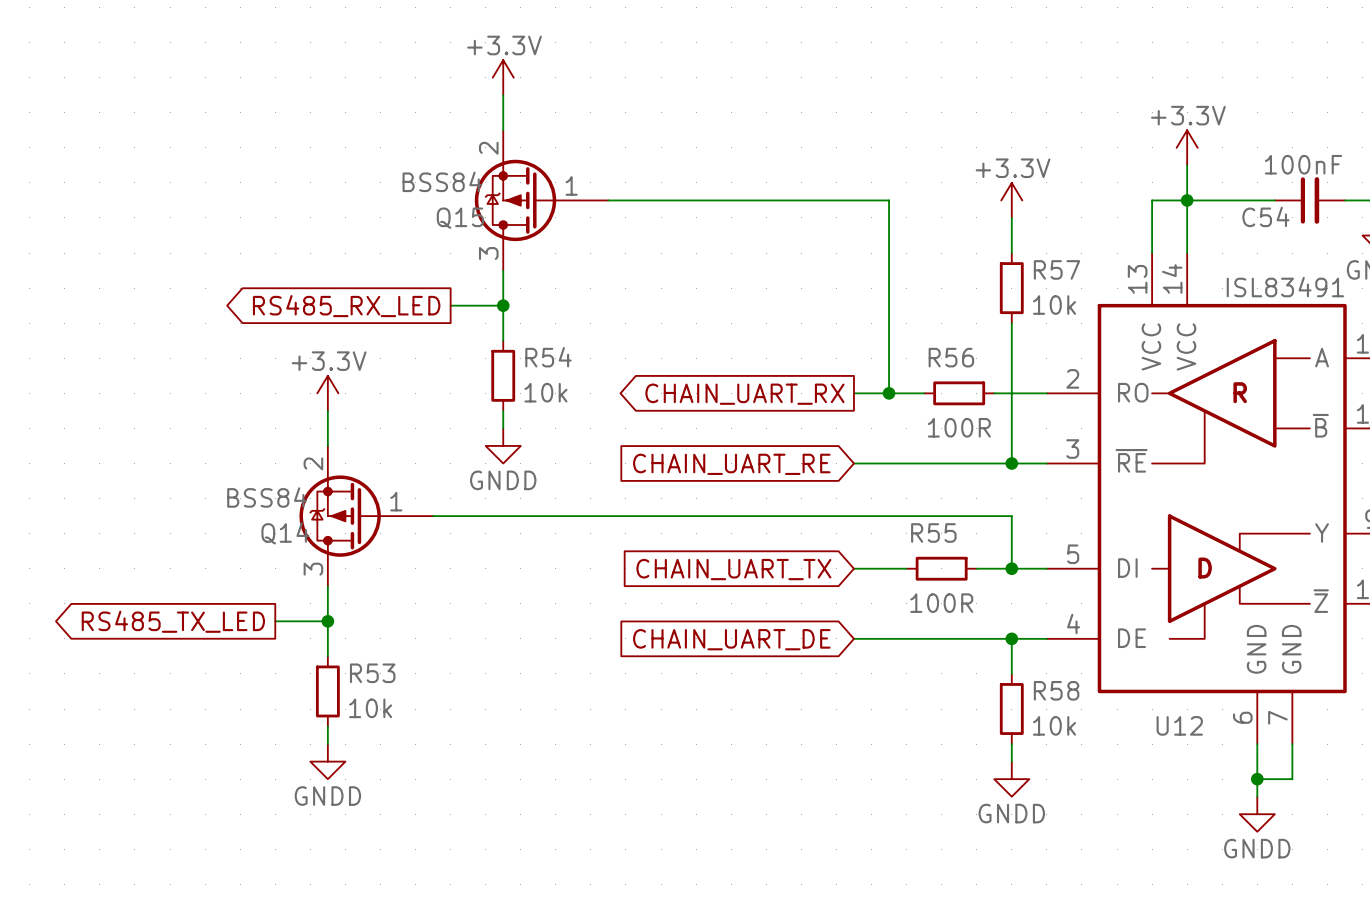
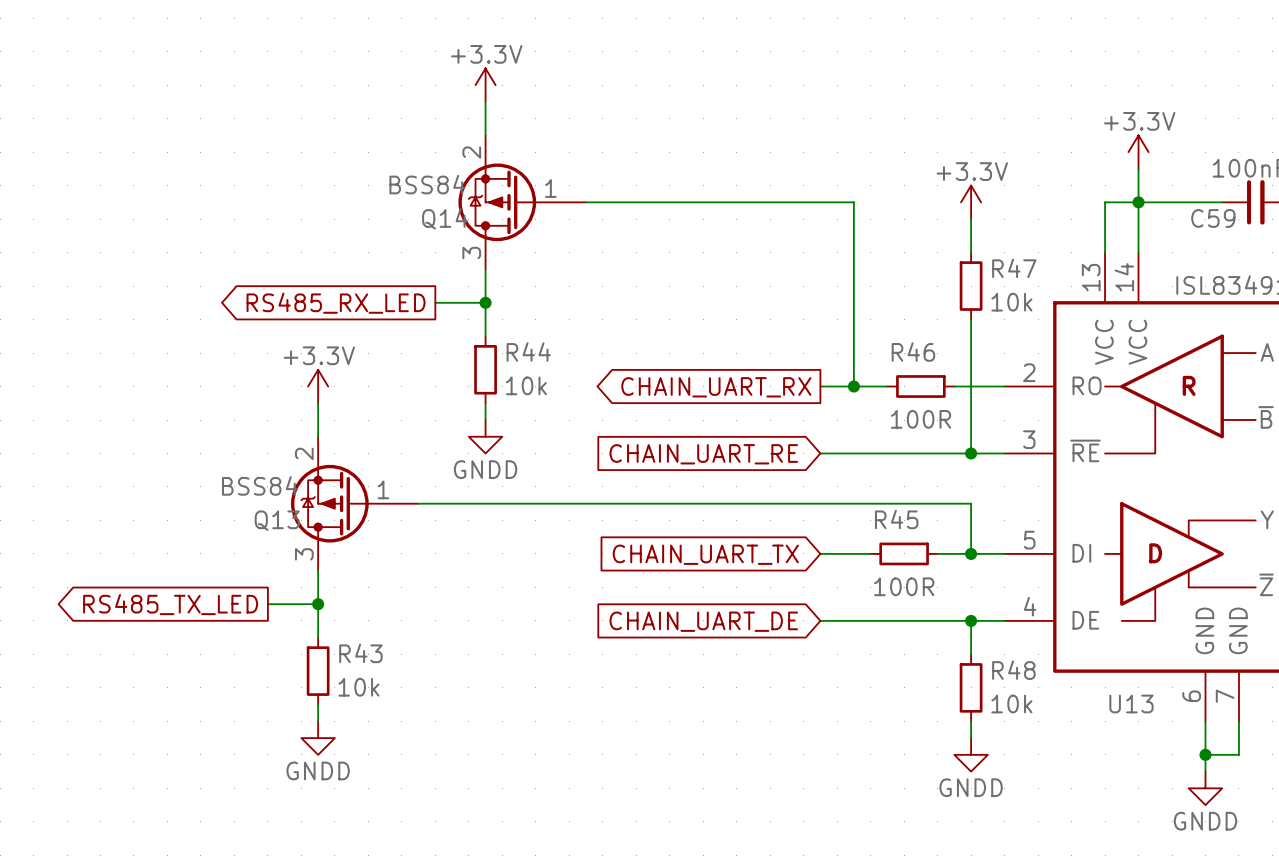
C54 name: C54 (1265, 216) -> C59 (1213, 218)
Q15 name: Q15 (460, 218) -> Q14 (445, 218)
R57 name: R57 (1057, 269) -> R47 (1014, 268)
R54 name: R54 (548, 357) -> R44 (528, 352)
R56 name: R56 (951, 357) -> R46 (913, 352)
R55 name: R55 (933, 532) -> R45 (896, 519)
Q14 name: Q14 (285, 533) -> Q13 (277, 520)
R53 name: R53 (372, 673) -> R43 (360, 653)
R58 name: R58 (1056, 690) -> R48 (1013, 670)
U12 name: U12 (1179, 725) -> U13 (1131, 703)

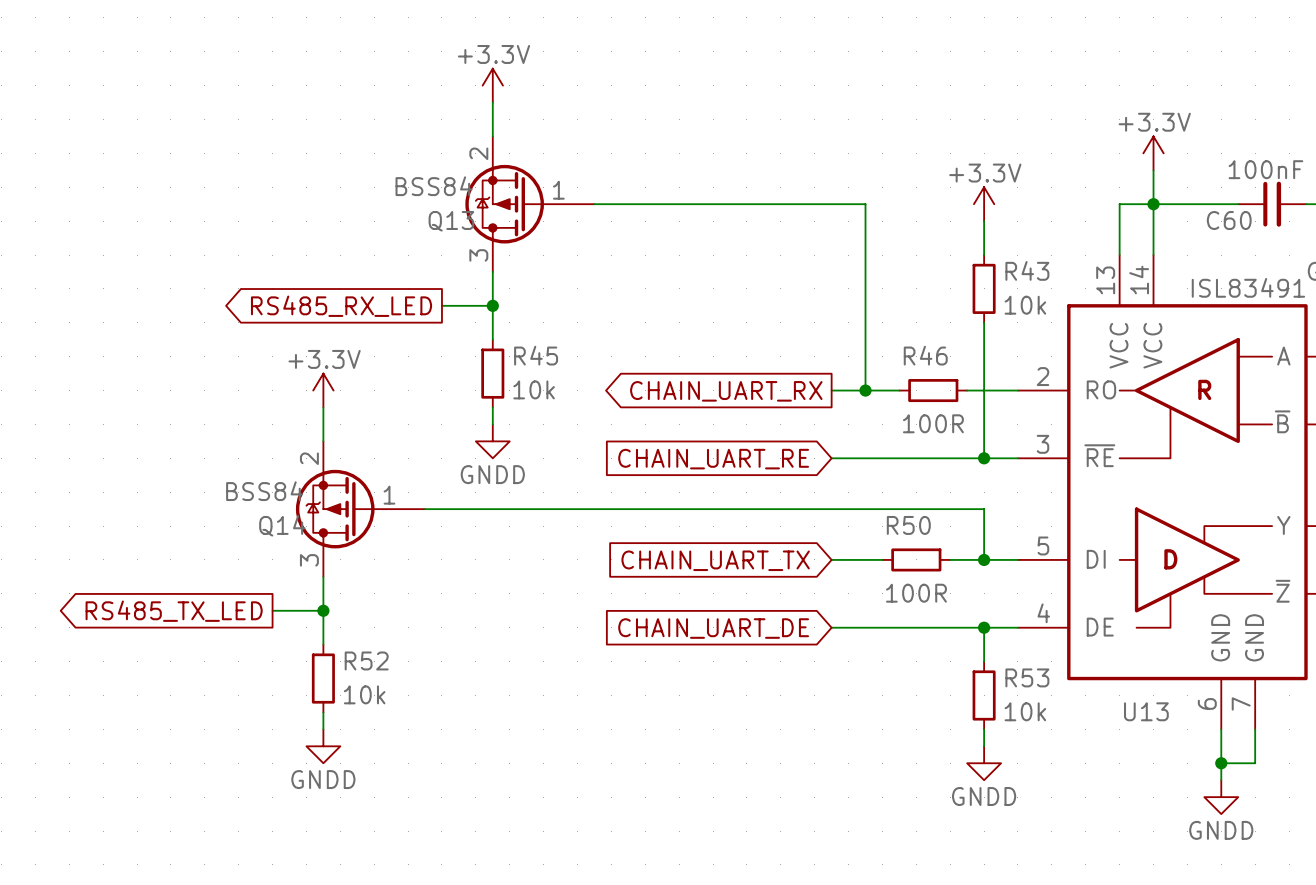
Q14 name: Q14 (445, 218) -> Q13 (451, 221)
C59 name: C59 (1213, 218) -> C60 (1229, 220)
R47 name: R47 (1014, 268) -> R43 (1027, 270)
R44 name: R44 (528, 352) -> R45 (536, 355)
R45 name: R45 (896, 519) -> R50 (908, 525)
Q13 name: Q13 (277, 520) -> Q14 (282, 525)
R43 name: R43 (360, 653) -> R52 (366, 660)
R48 name: R48 (1013, 670) -> R53 (1027, 677)

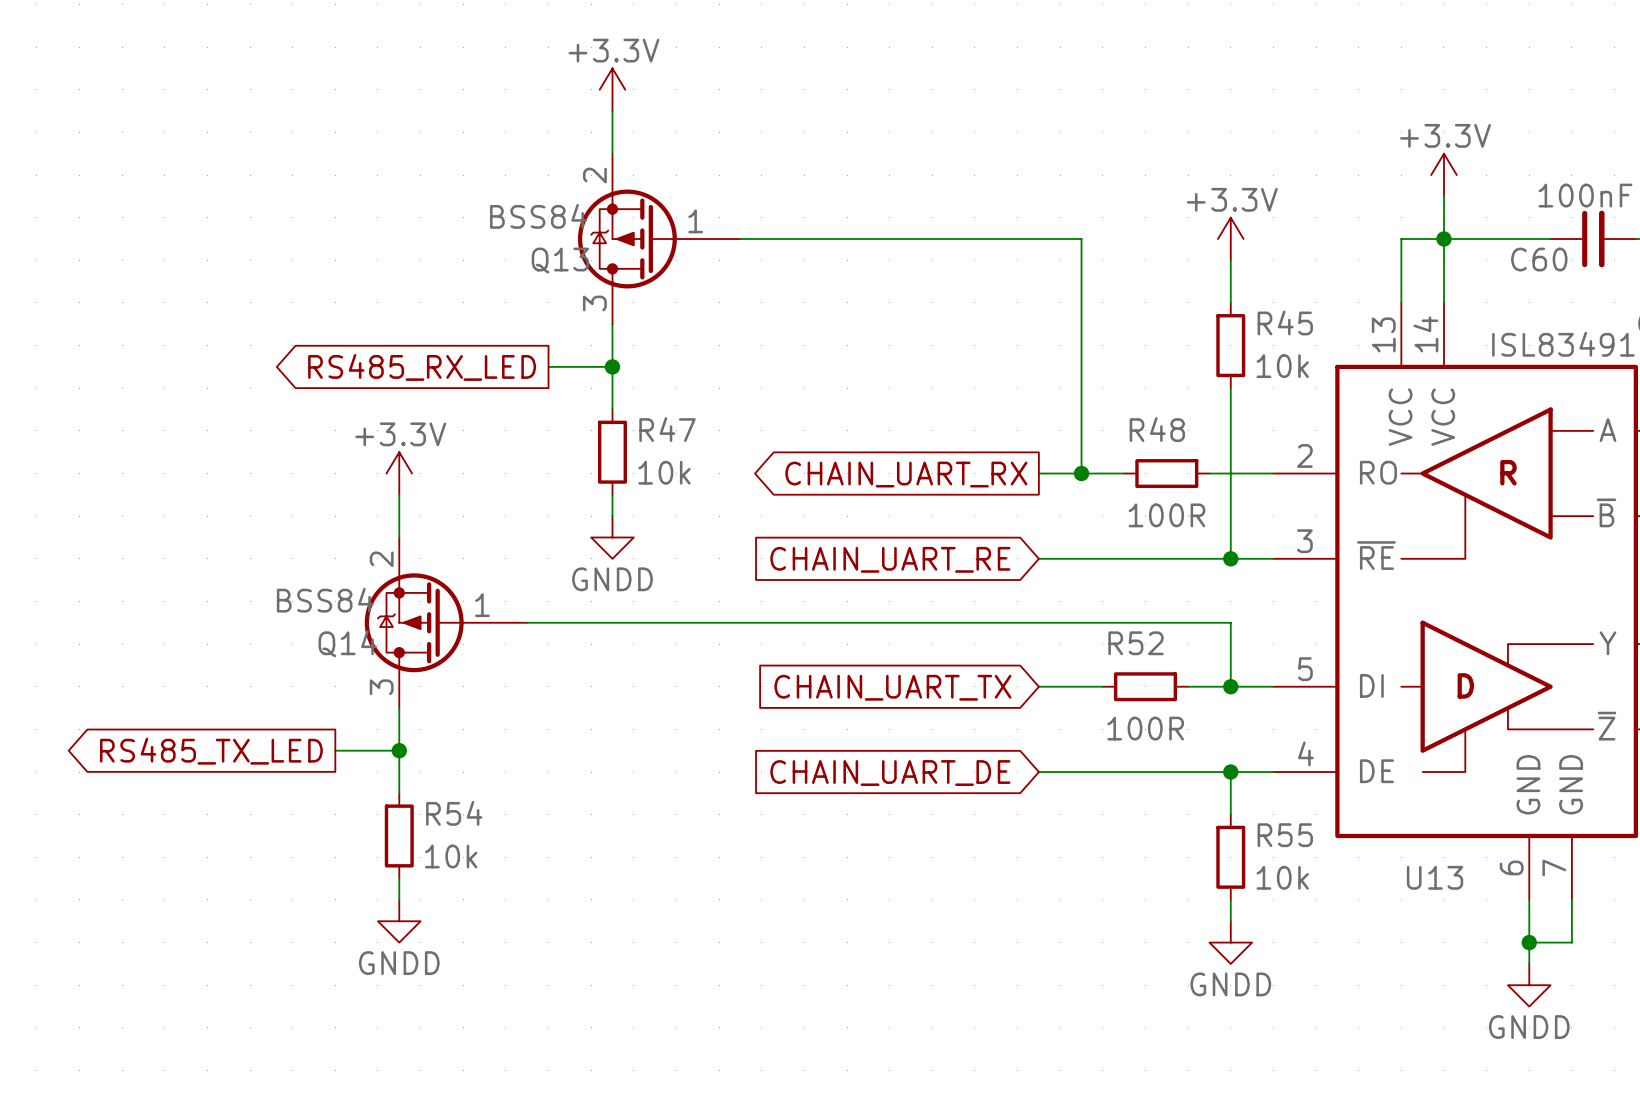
R43 name: R43 (1027, 270) -> R45 (1285, 322)
R45 name: R45 (536, 355) -> R47 (667, 429)
R46 name: R46 (925, 355) -> R48 (1157, 429)
R50 name: R50 (908, 525) -> R52 (1136, 643)
R52 name: R52 (366, 660) -> R54 (454, 813)
R53 name: R53 (1027, 677) -> R55 (1285, 835)

